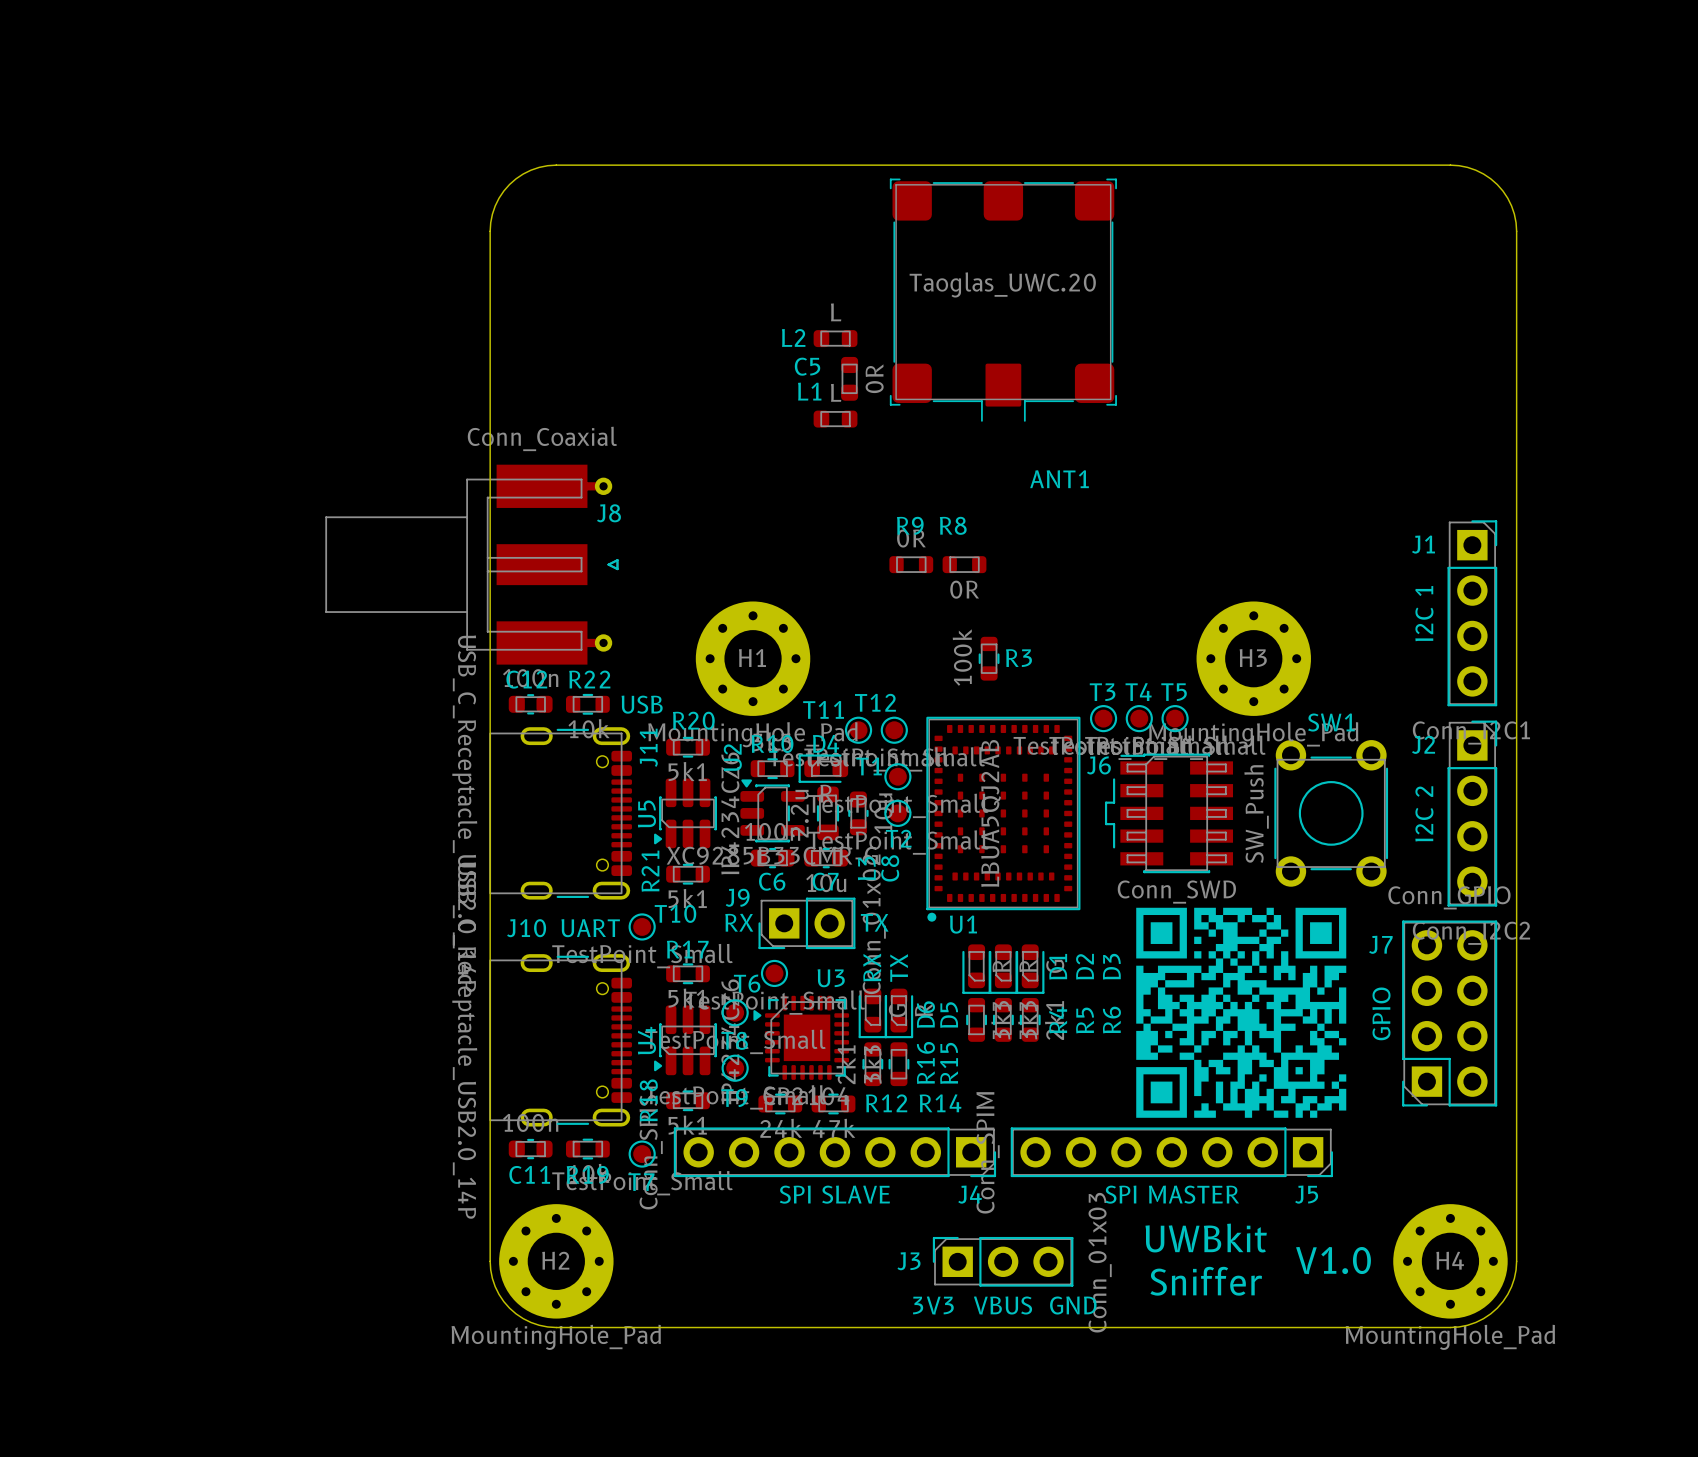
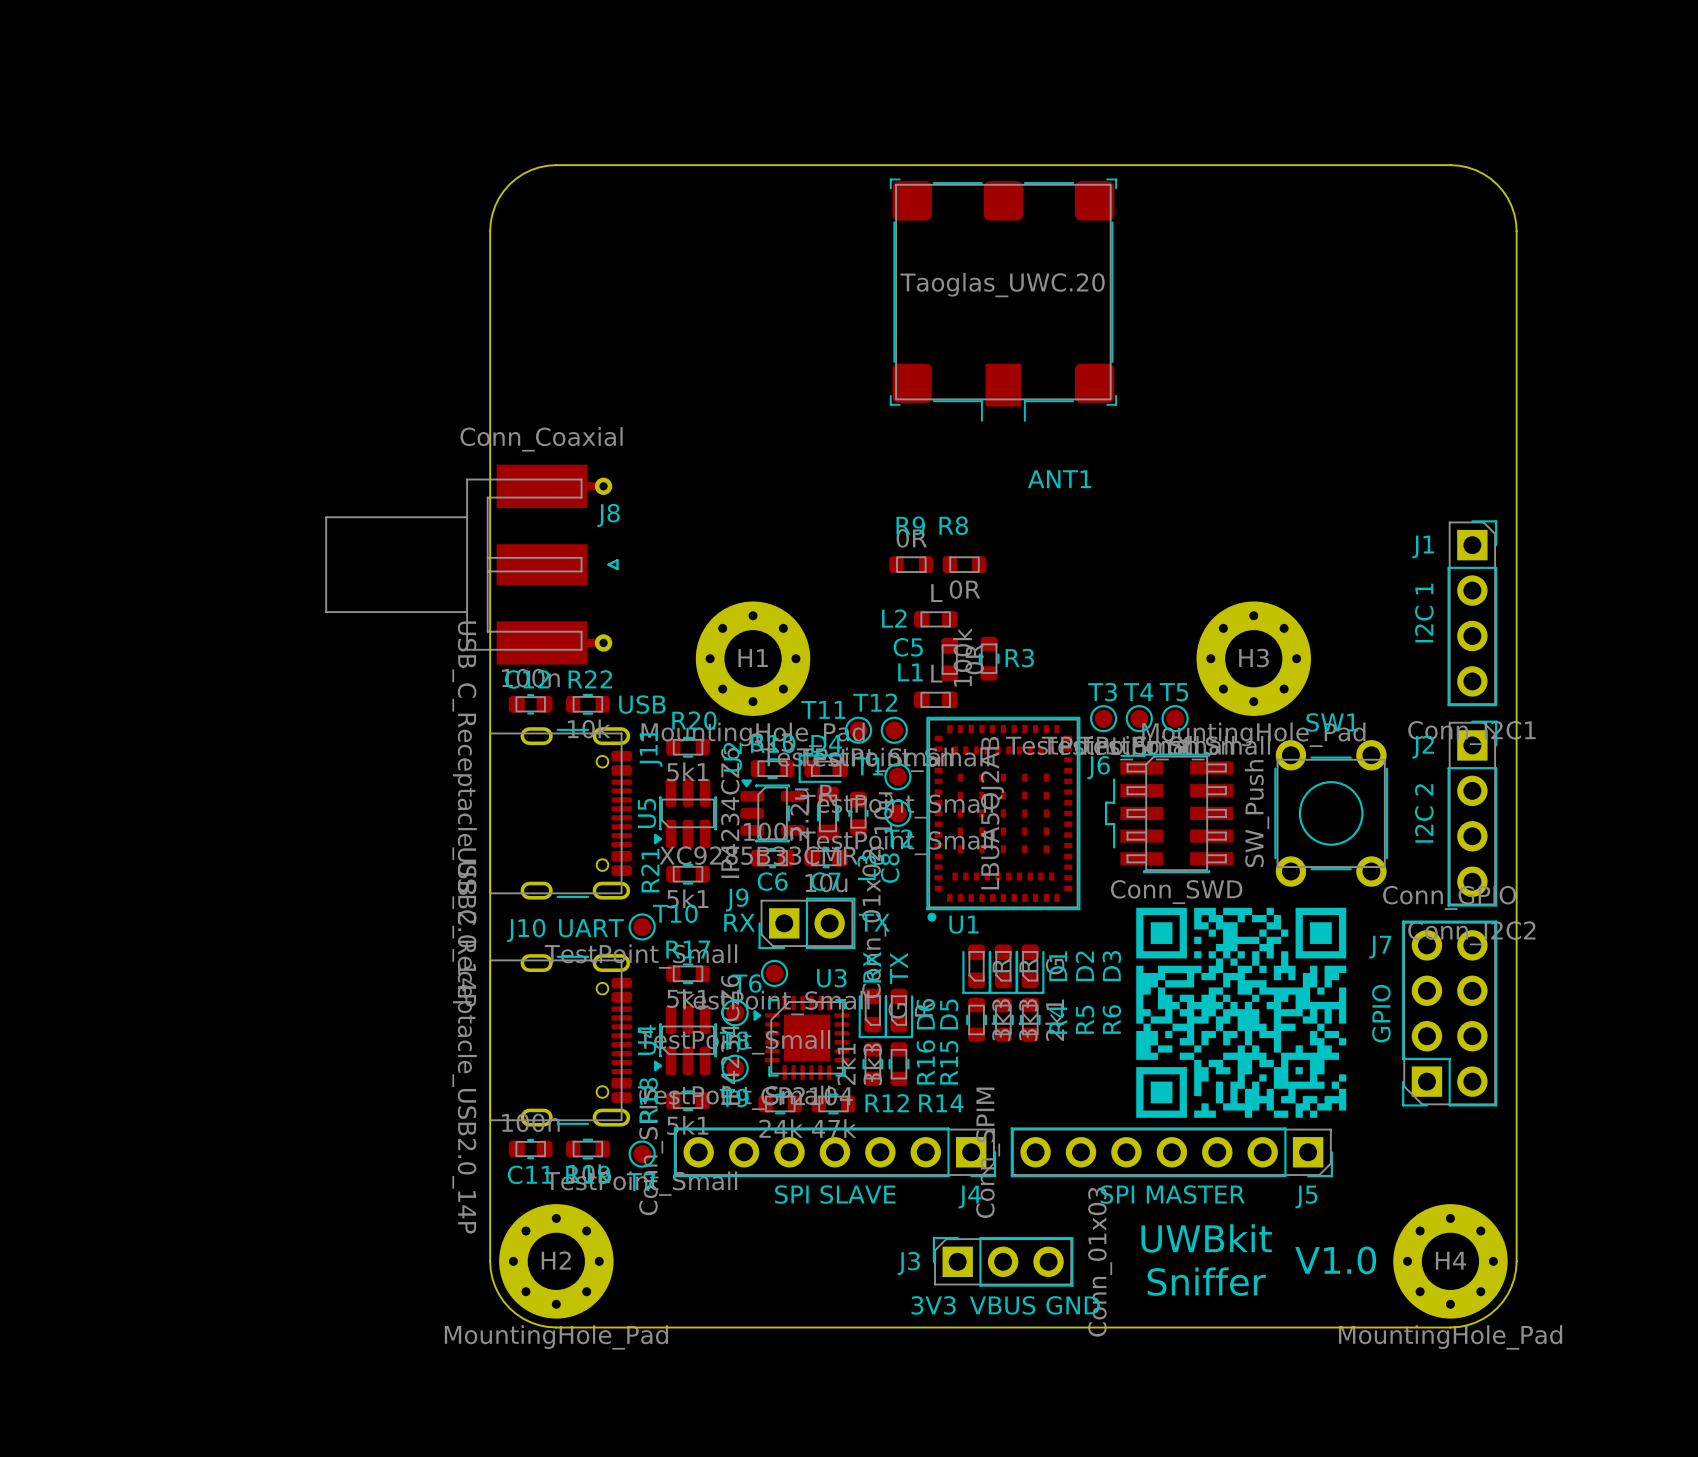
L2 position: (835, 338) -> (935, 619)
C5 position: (849, 378) -> (949, 659)
L1 position: (835, 419) -> (935, 699)

